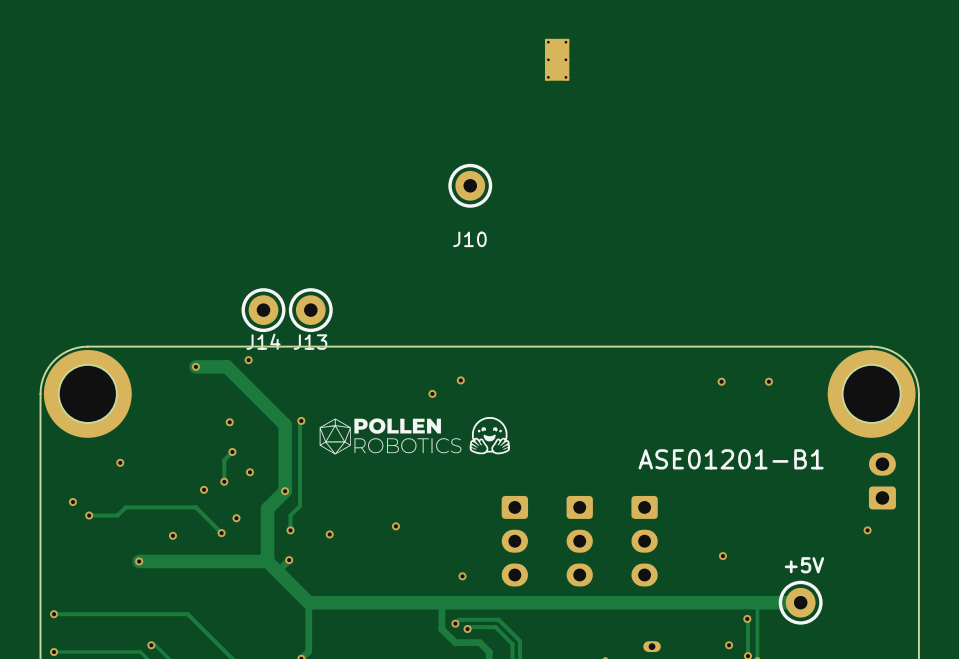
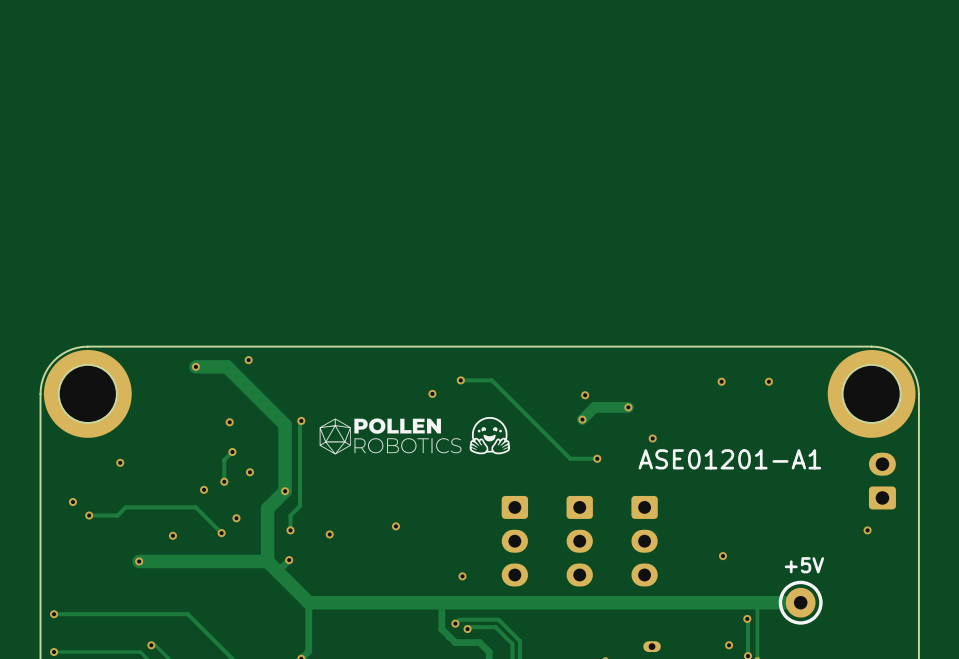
part: (557, 59) -> none
J10: (470, 185) -> none
J14: (263, 310) -> none
J13: (310, 310) -> none
track: none -> (460, 380) (491, 380) (570, 458) (597, 458)
via: none -> (585, 395)
track: none -> (628, 407) (594, 407) (582, 419)
via: none -> (628, 407)
via: none -> (582, 419)
via: none -> (652, 438)
via: none -> (597, 458)
text: ASE01201-B1 (731, 459) -> ASE01201-A1 (729, 459)

